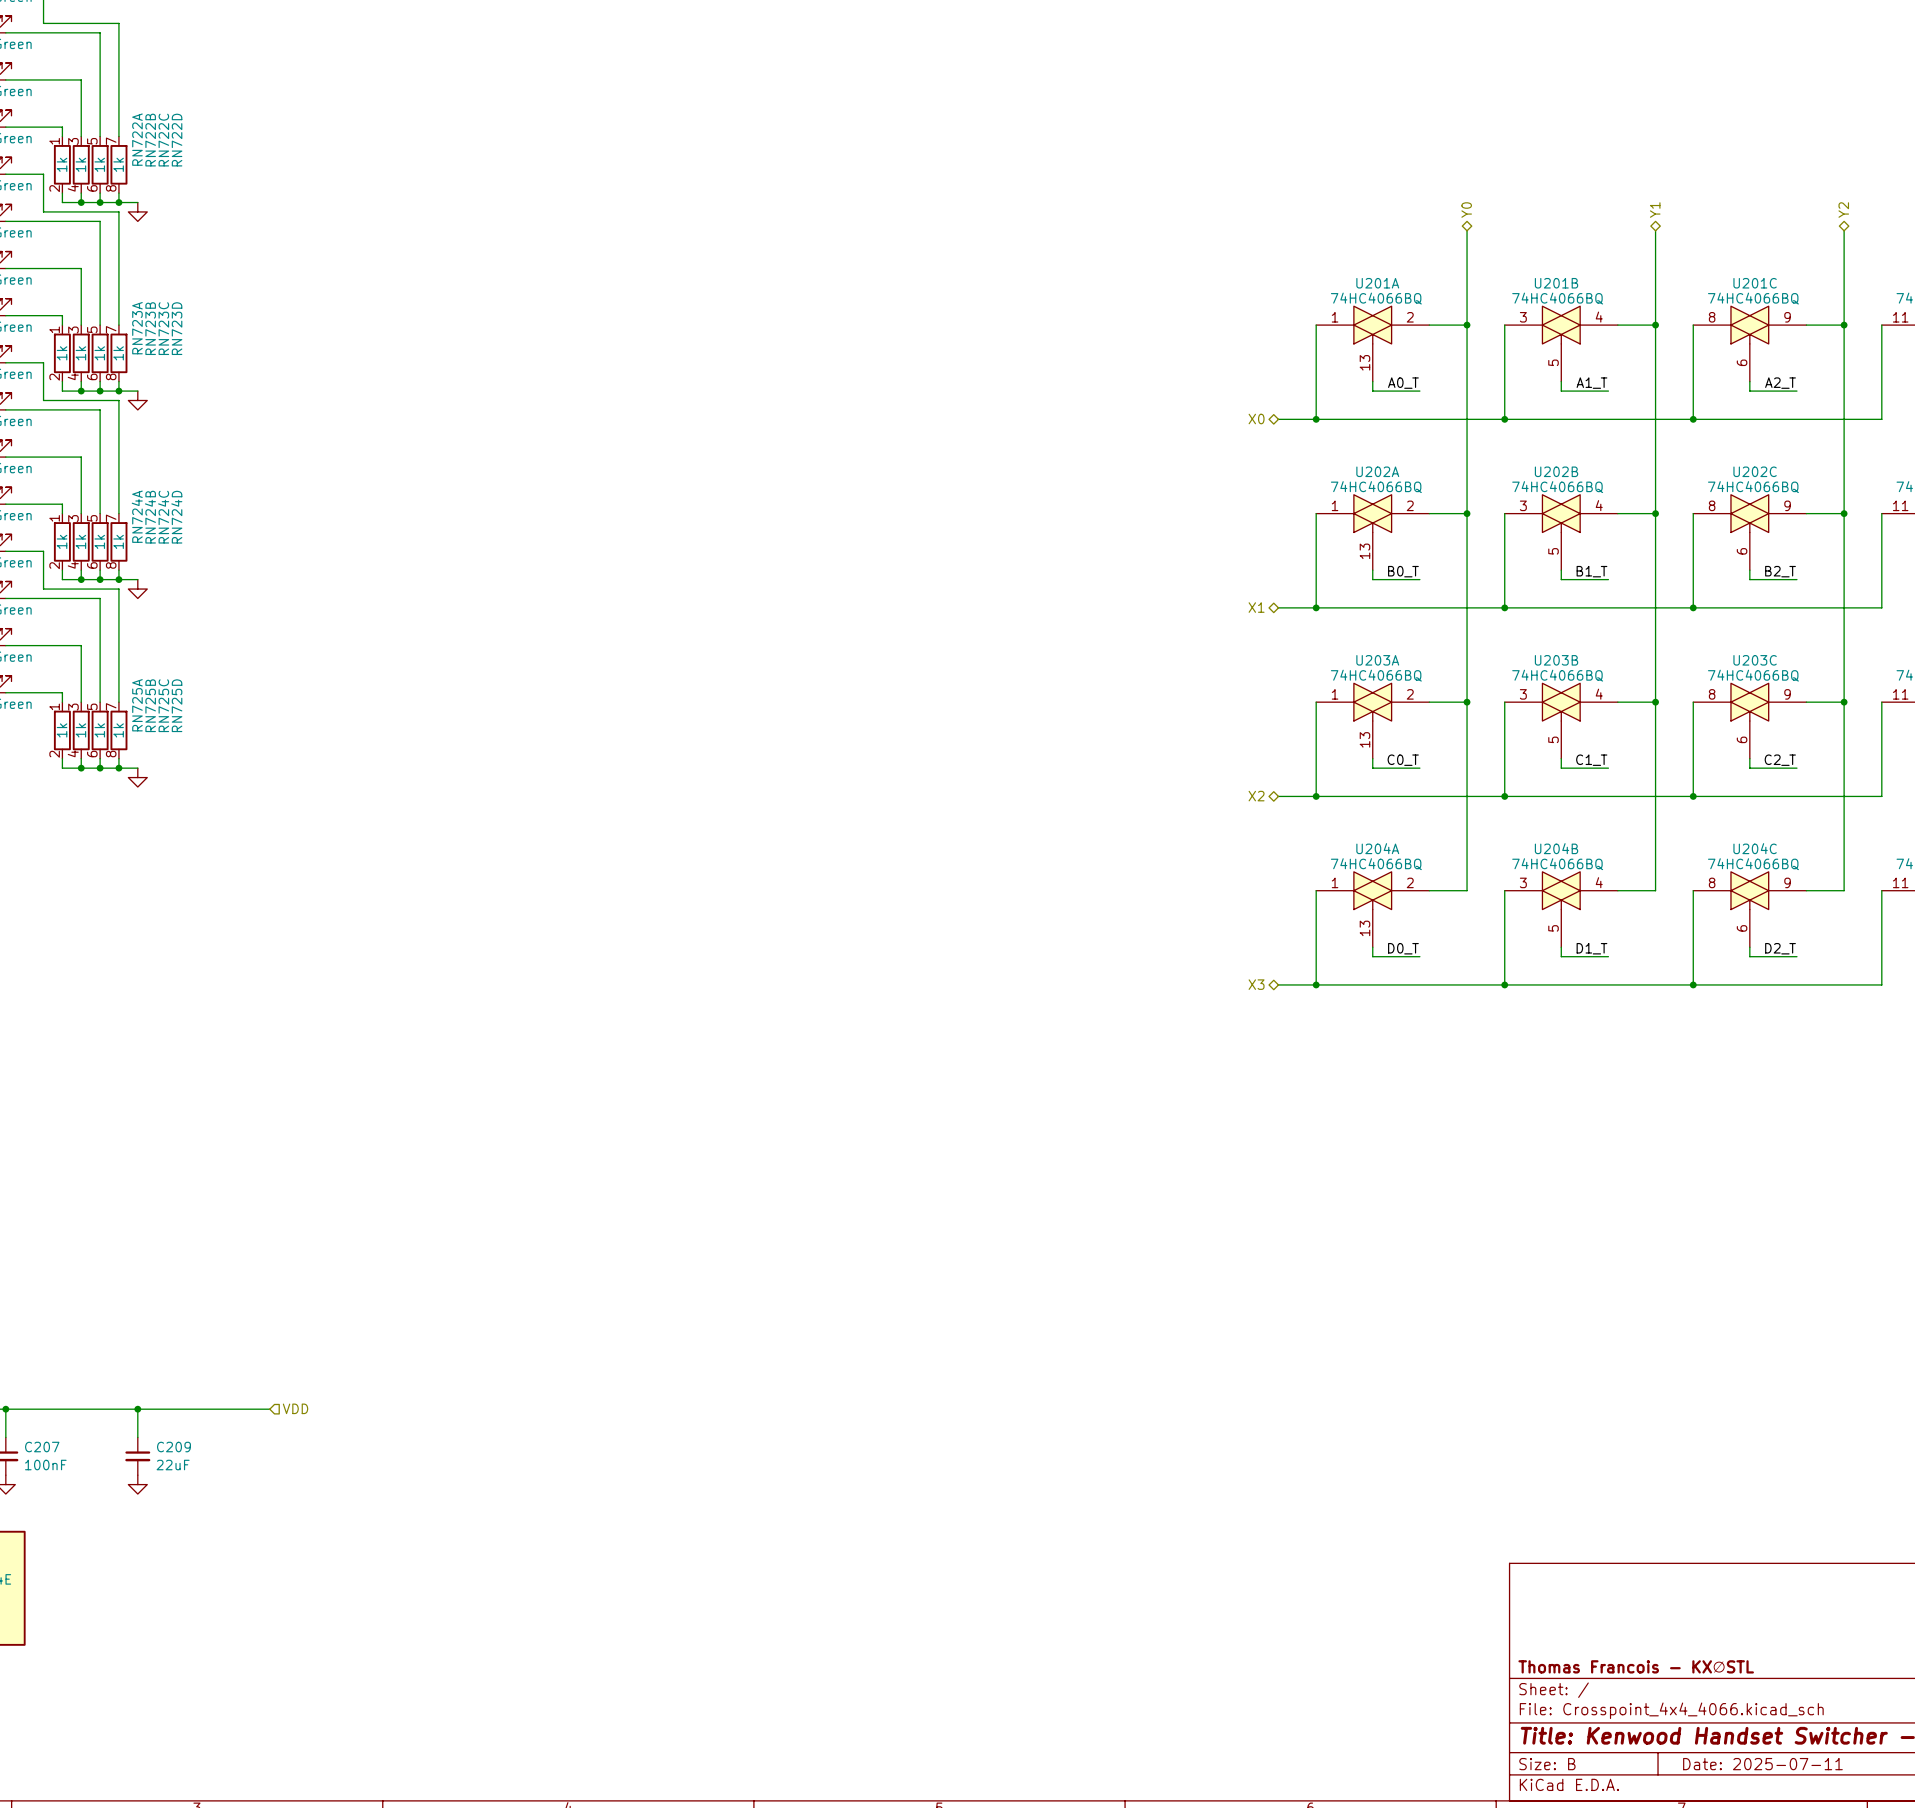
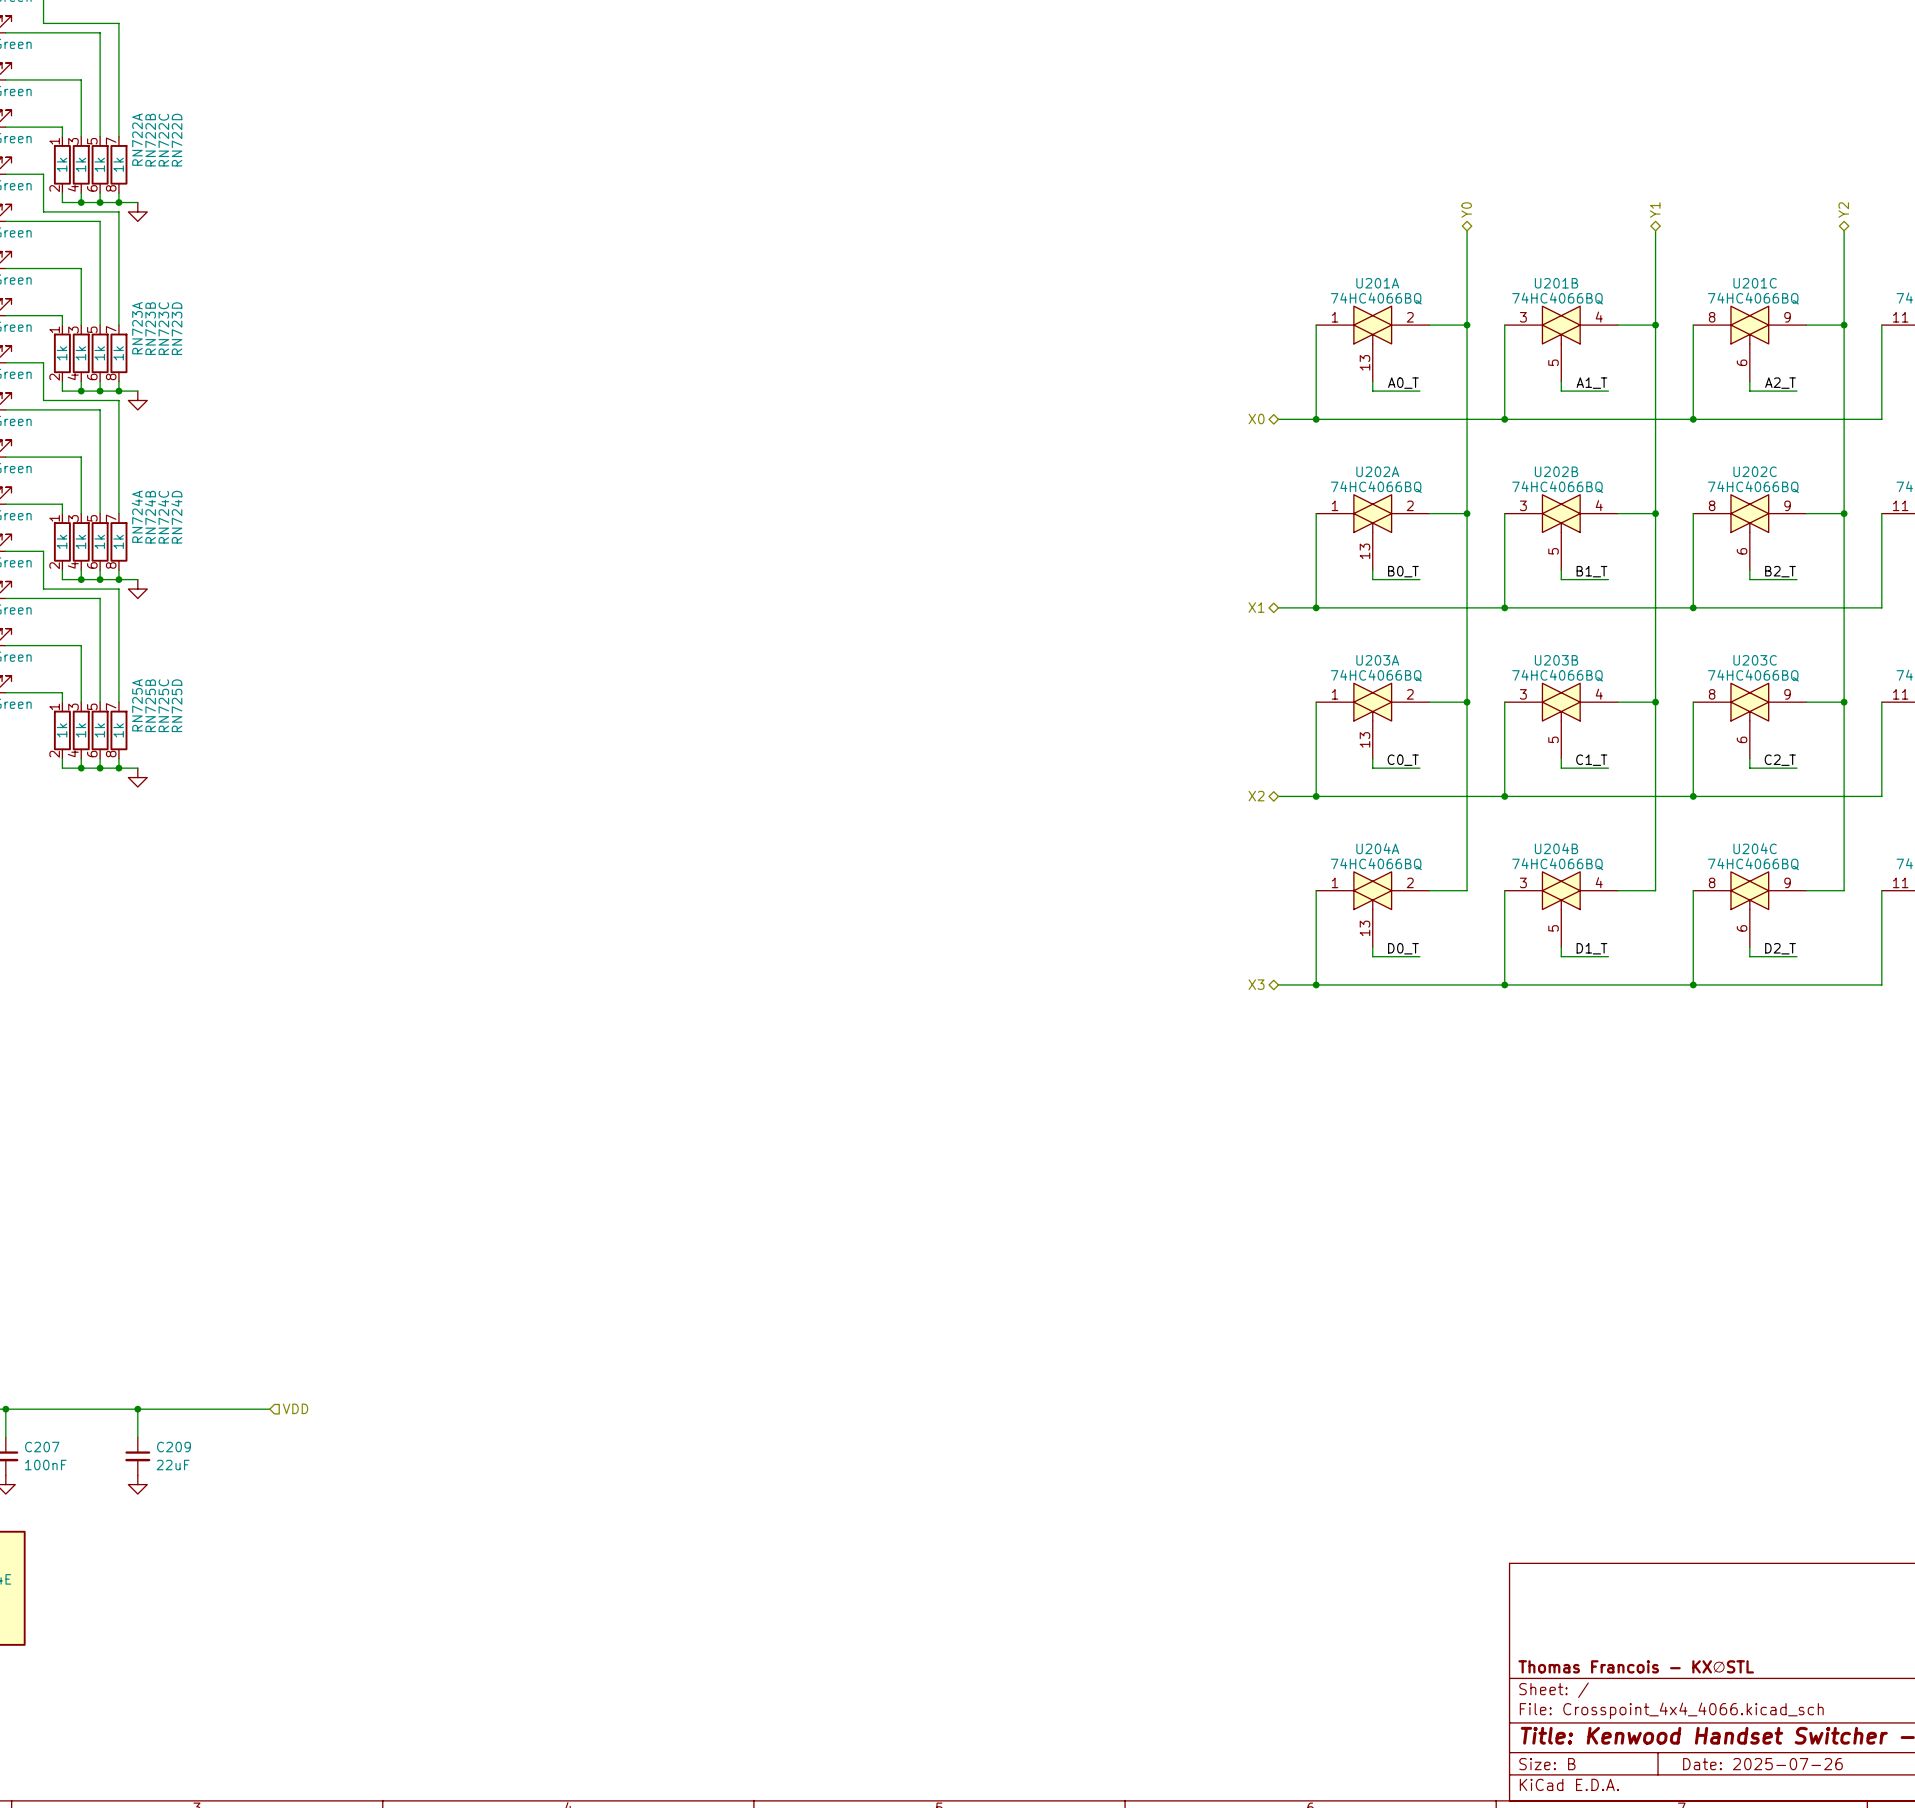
title block: Date: 2025-07-11 (1762, 1764) -> Date: 2025-07-26 (1762, 1764)

